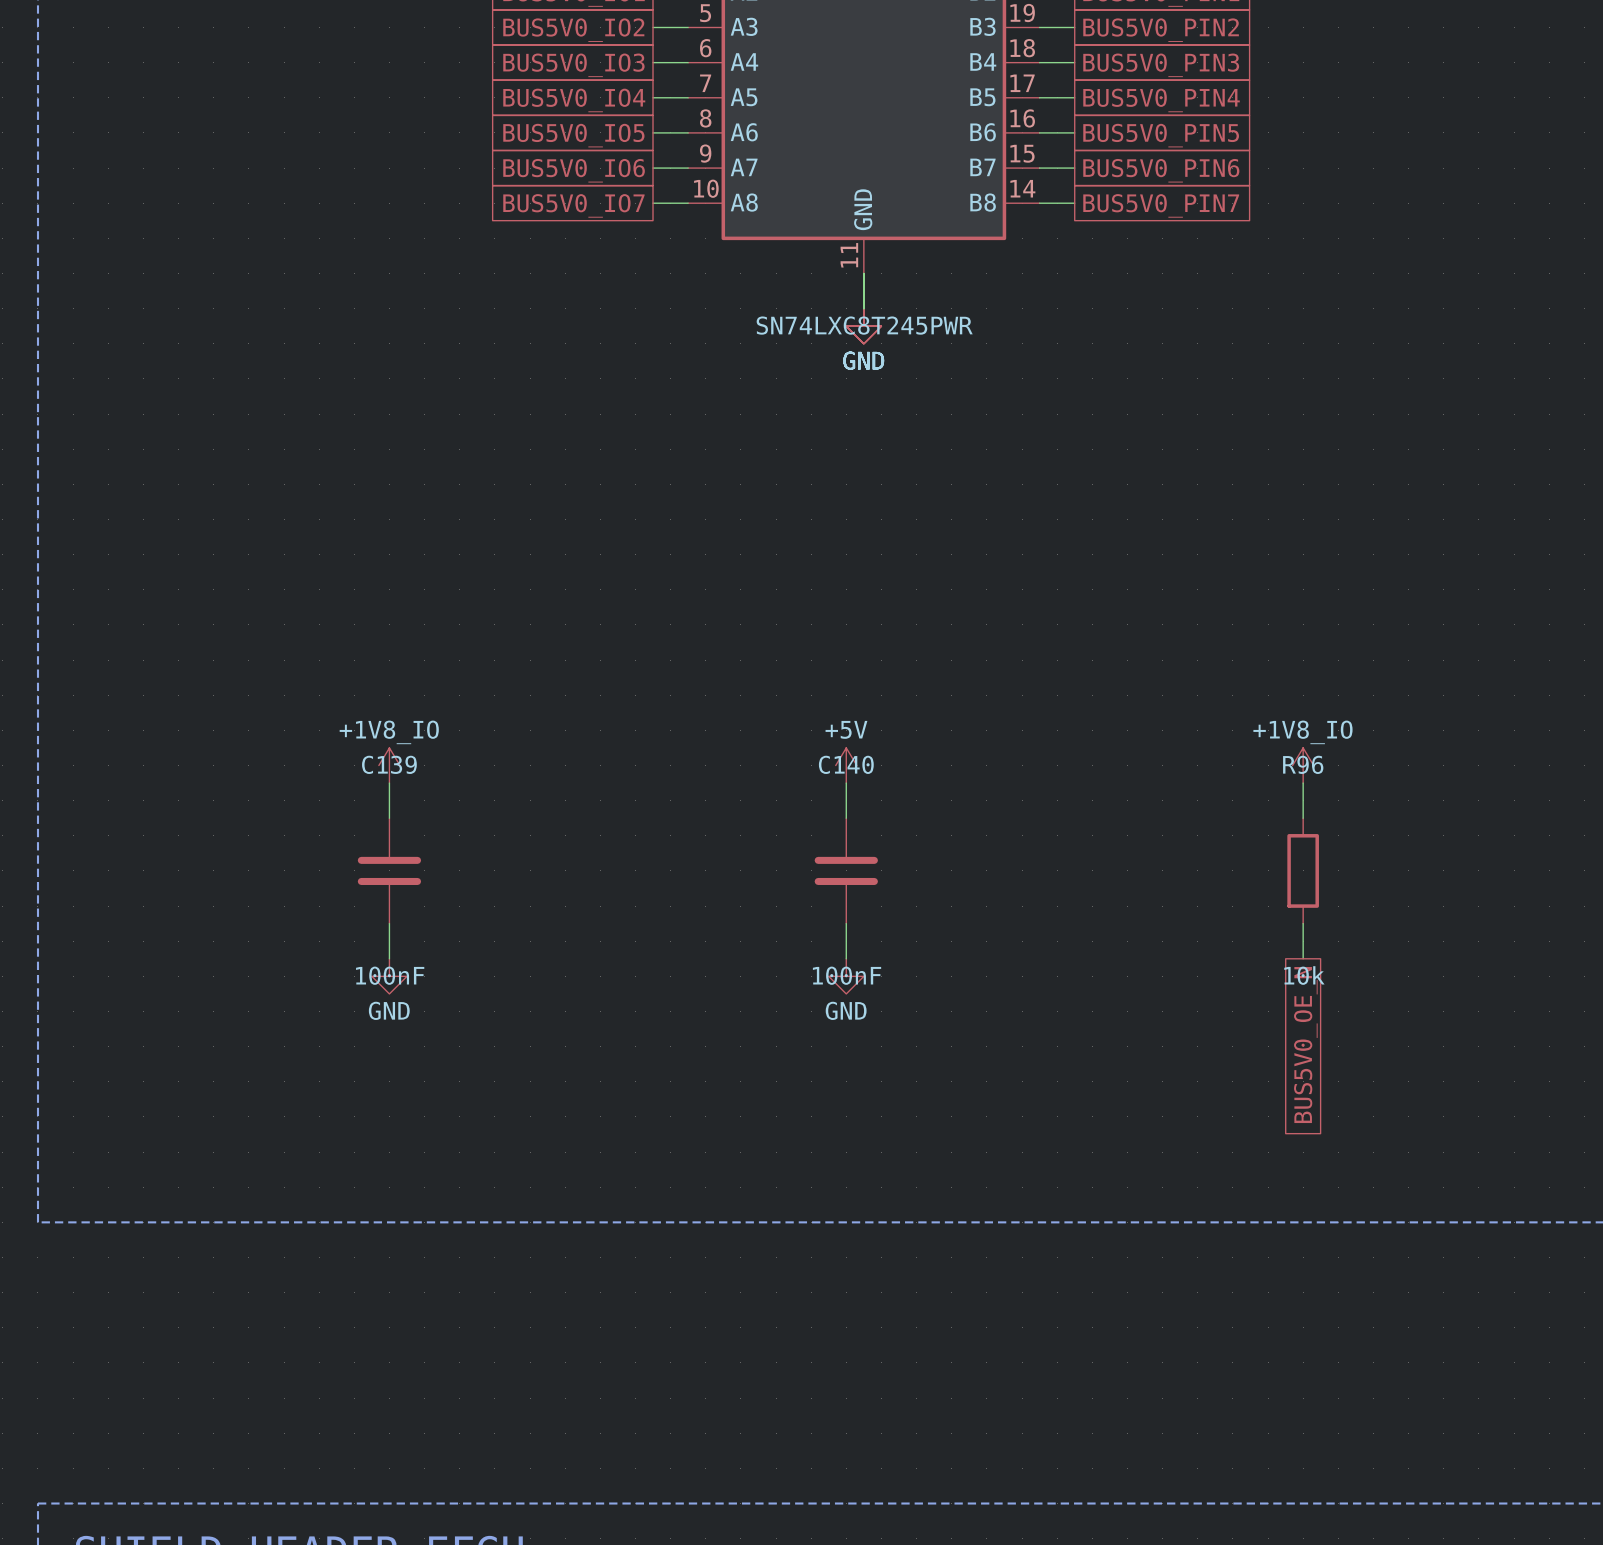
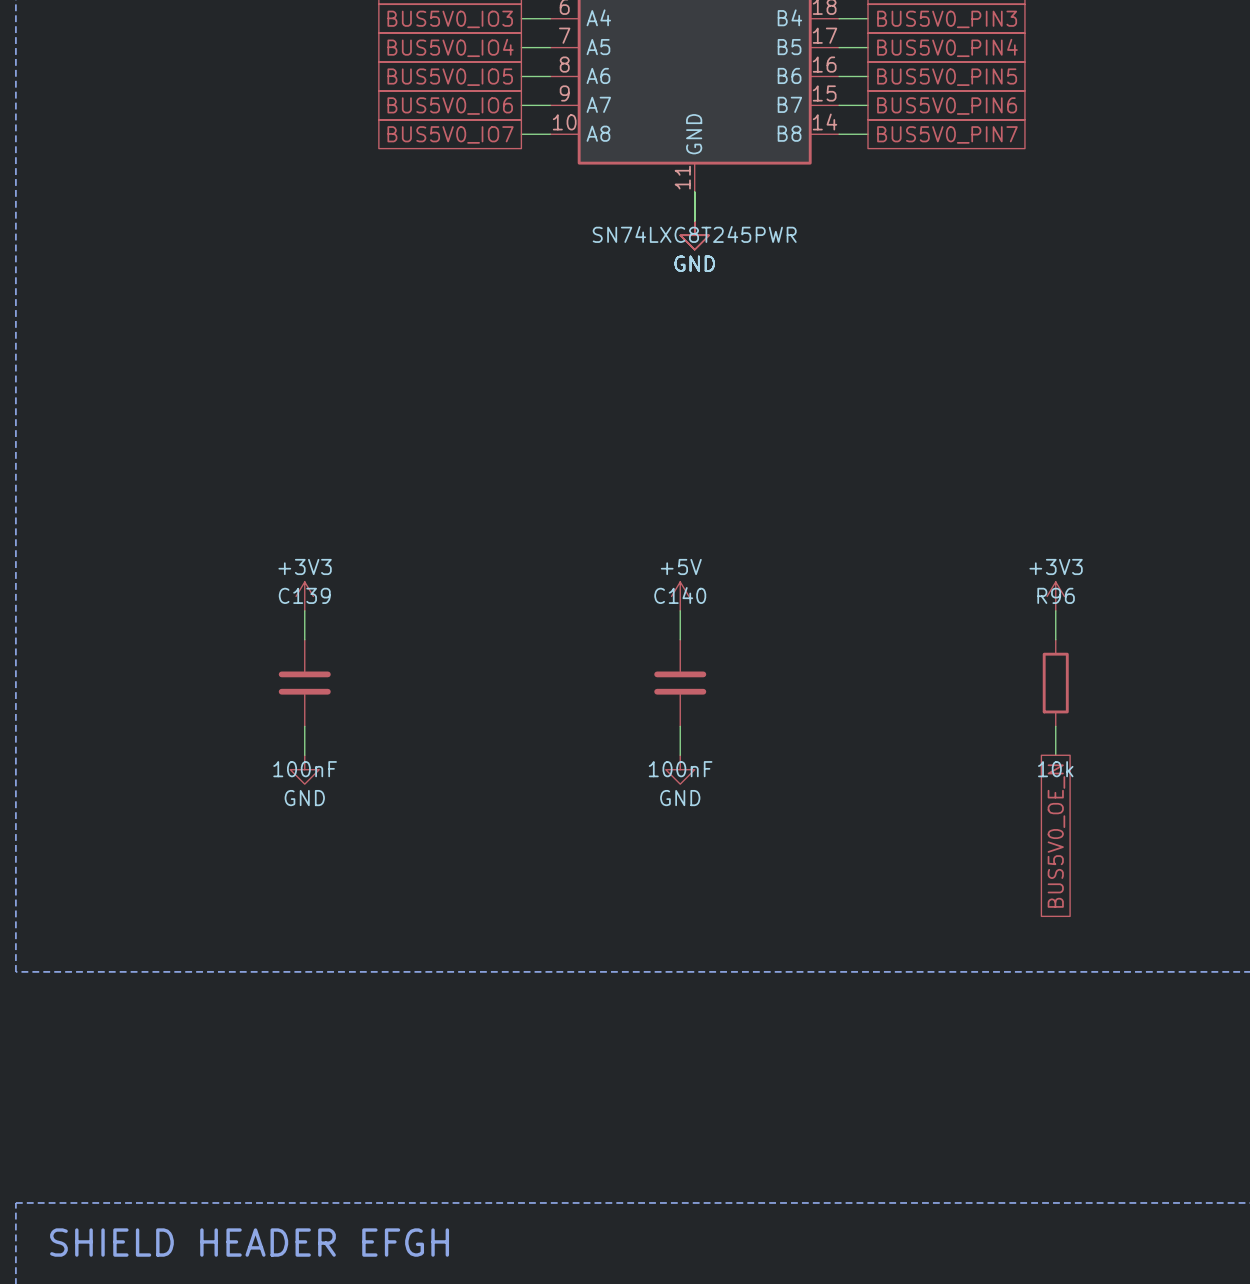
power symbol: +1V8_IO (389, 765) -> +3V3 (304, 596)
power symbol: +1V8_IO (1303, 765) -> +3V3 (1055, 596)

